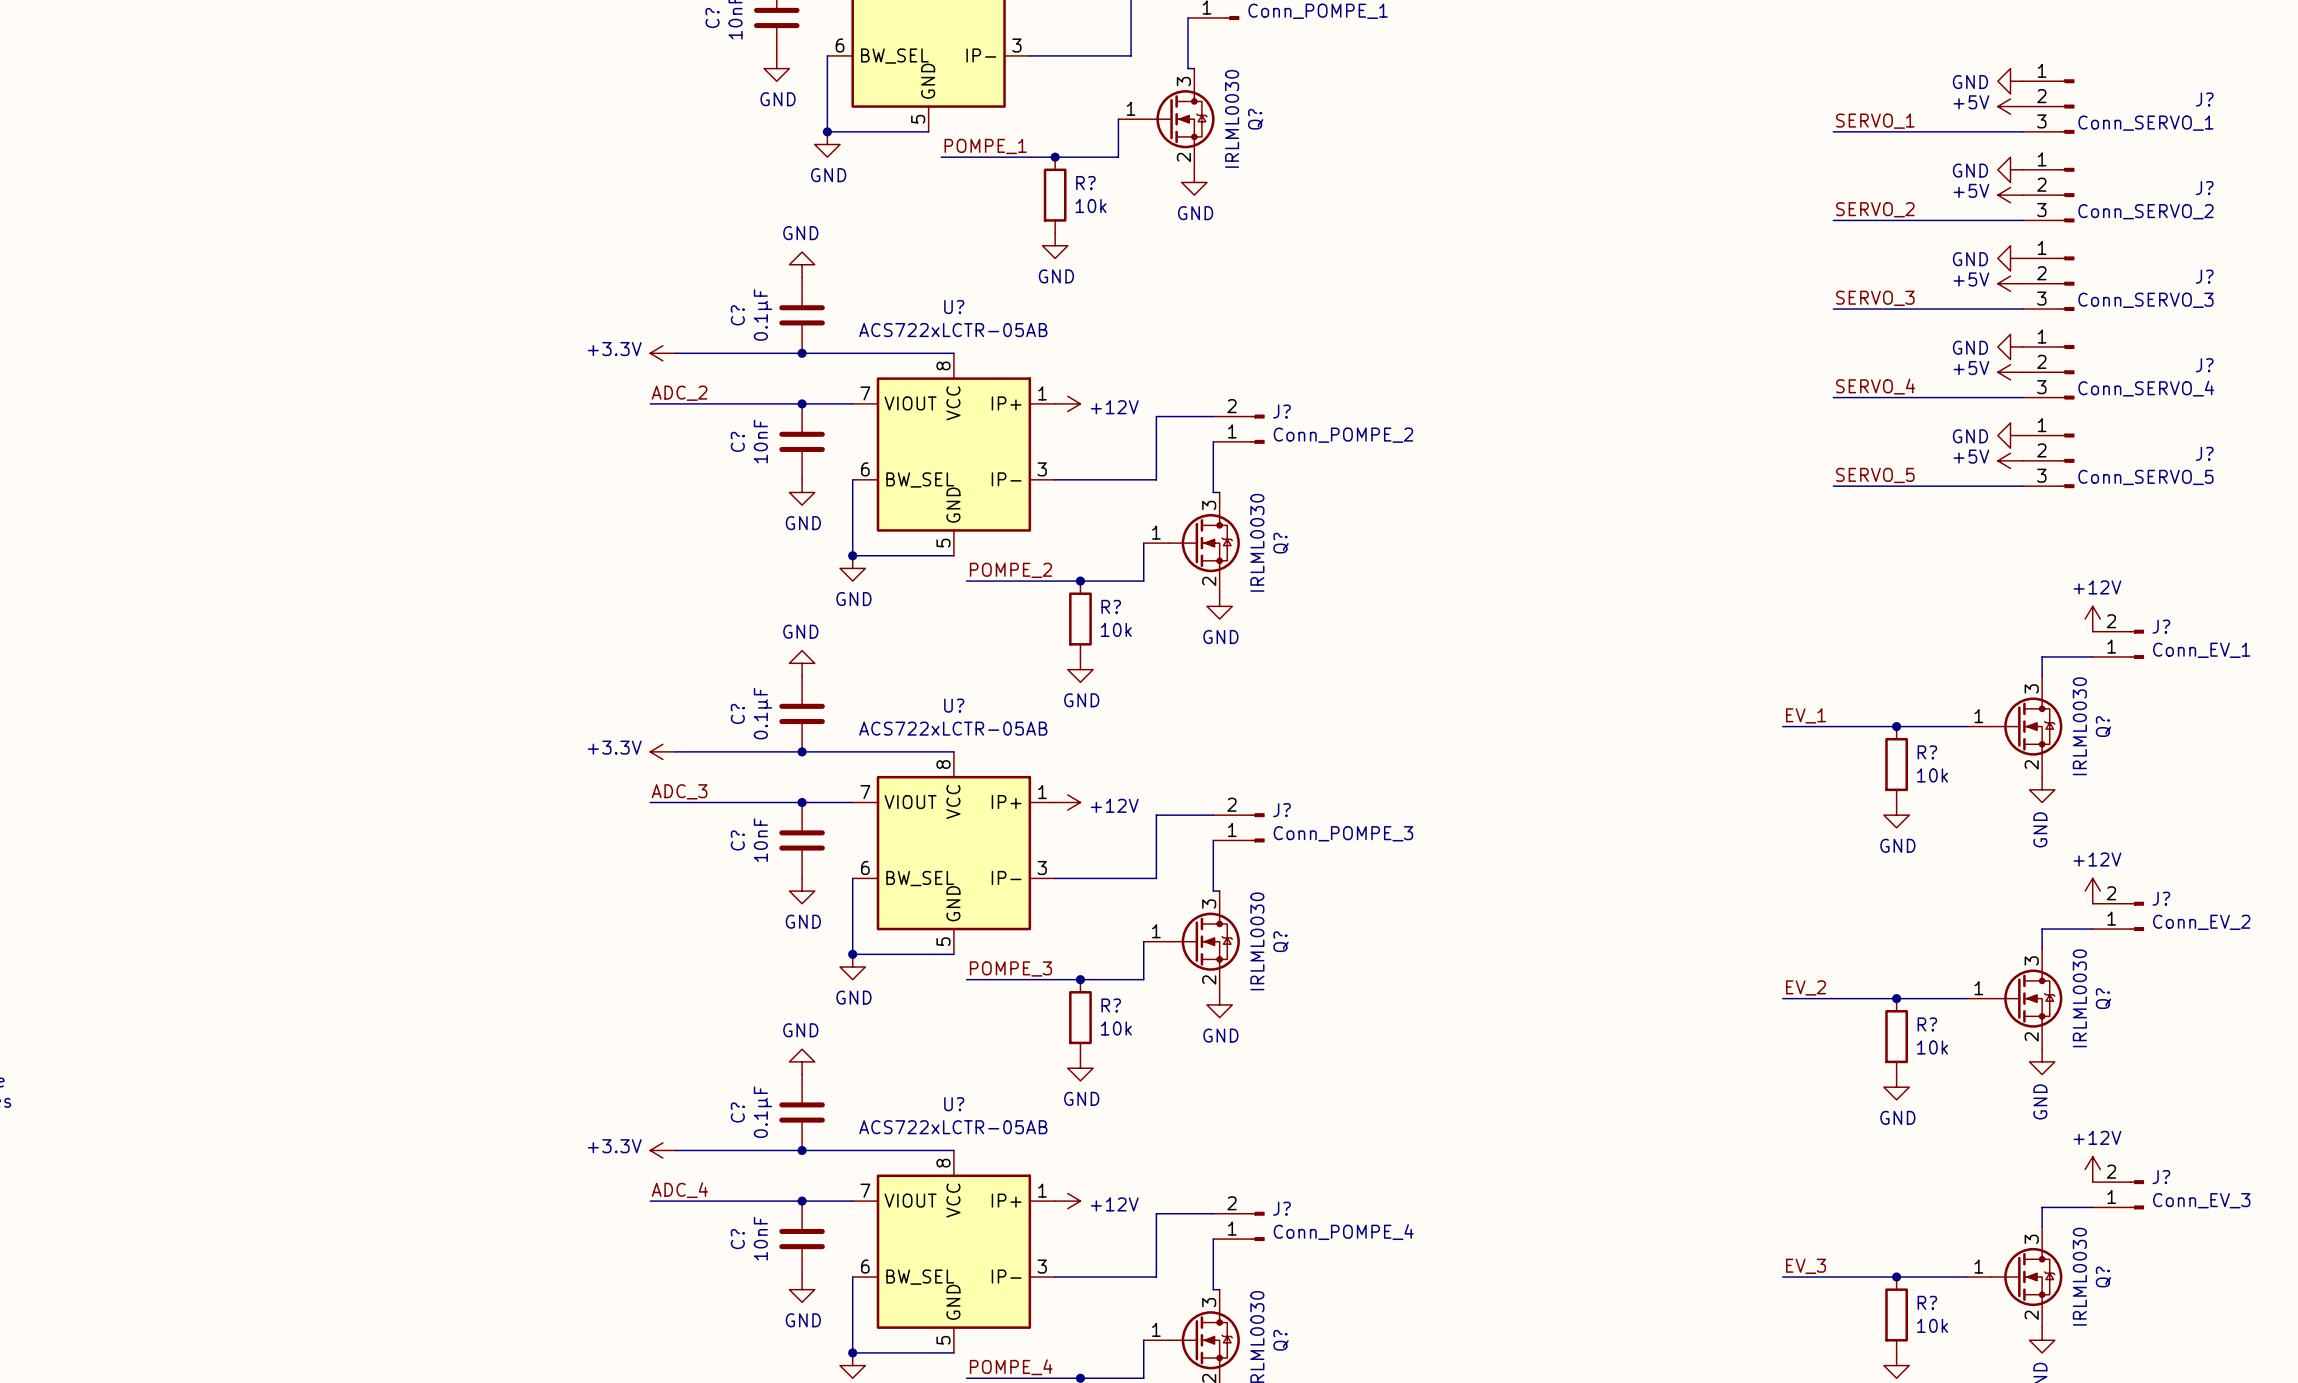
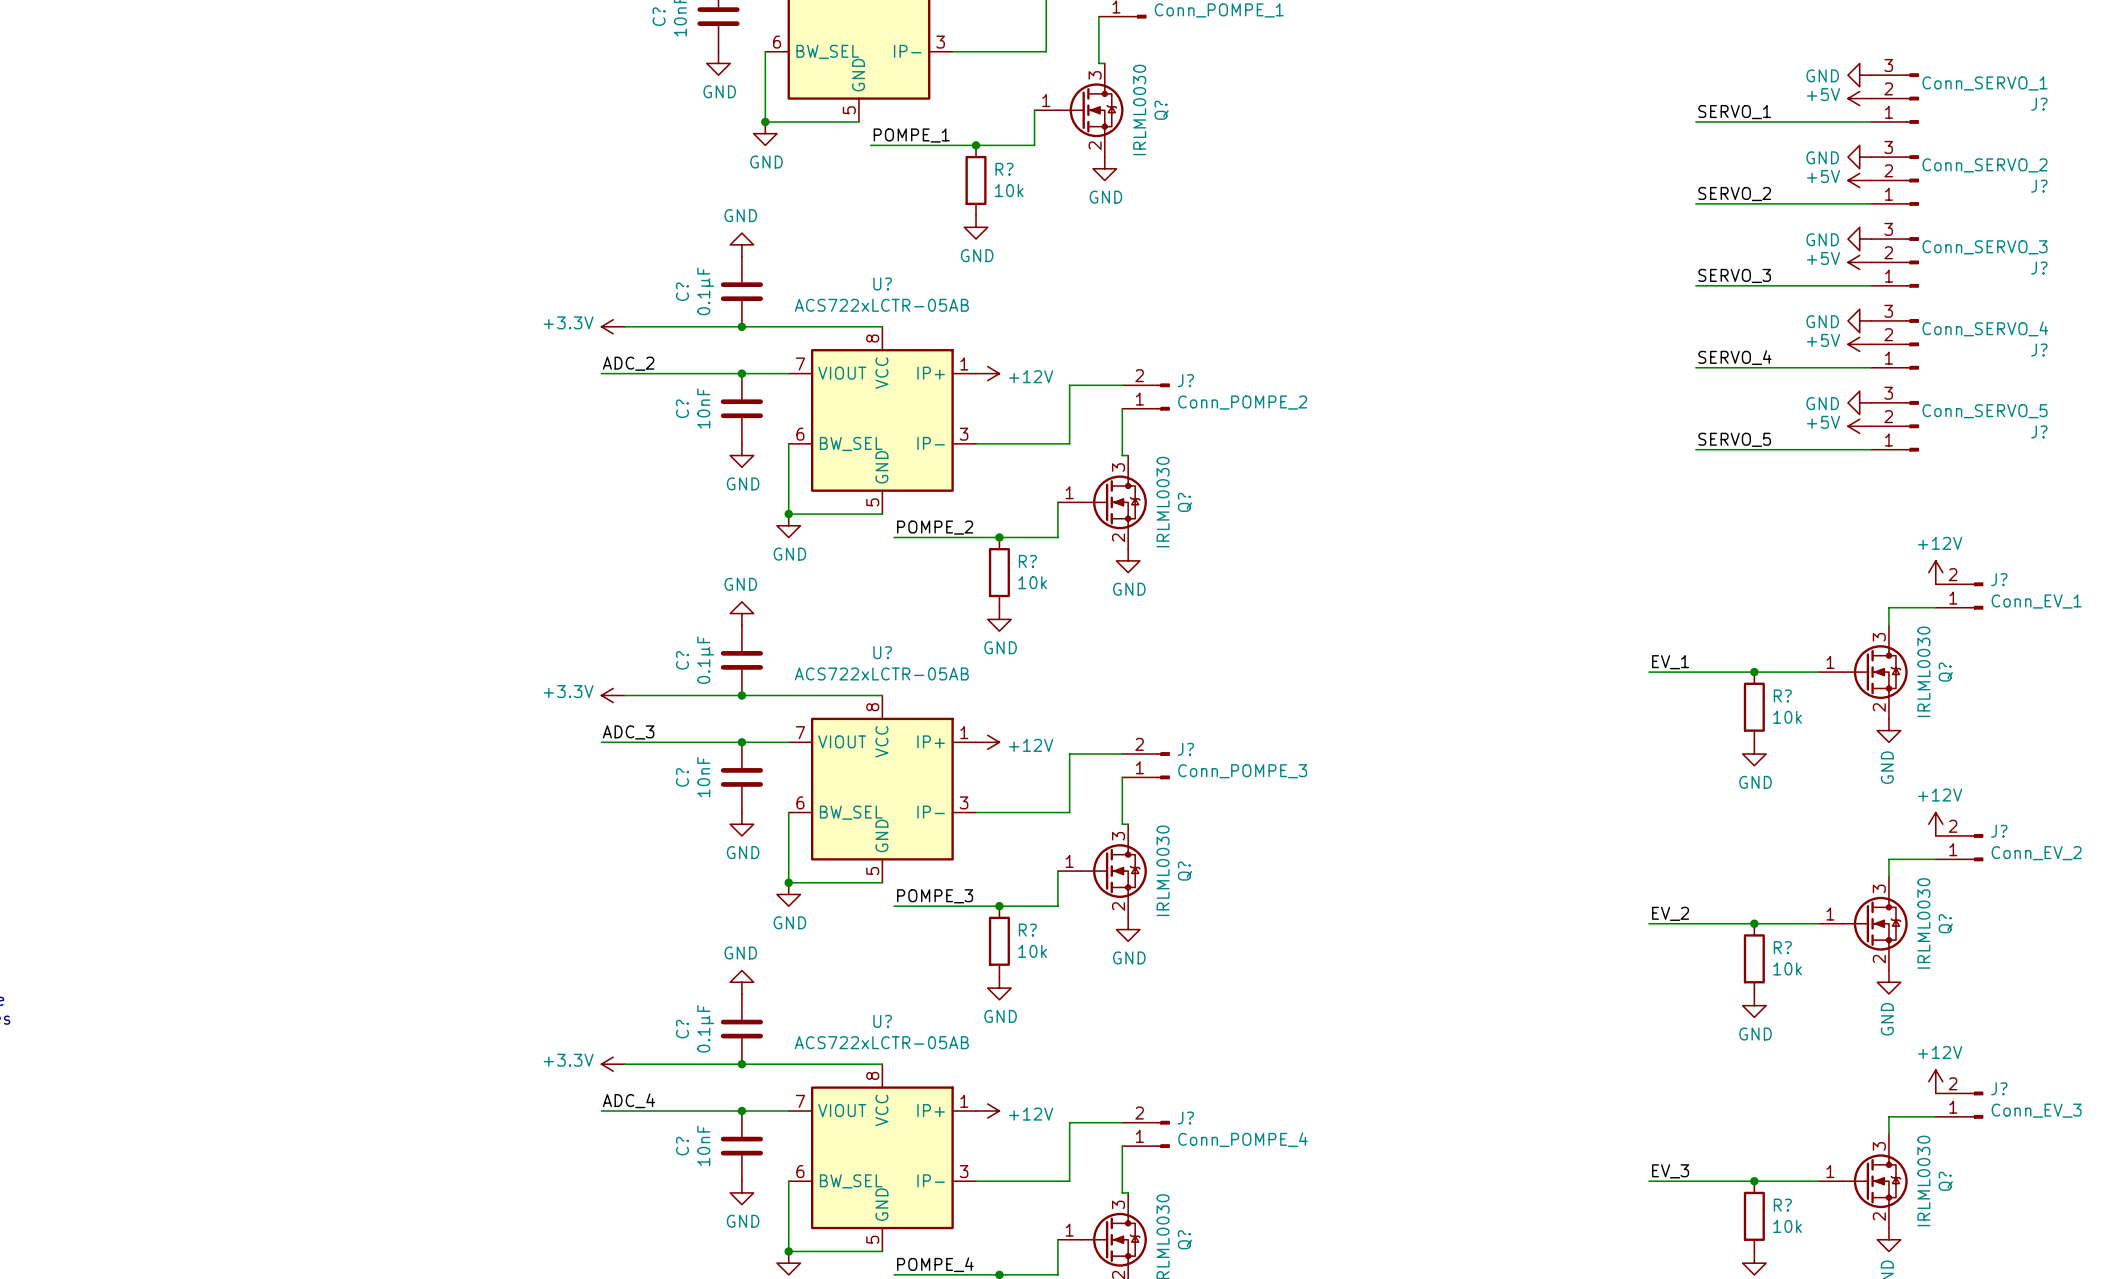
J? flip: as is (2067, 106) -> up-down (1912, 98)
J? flip: as is (2067, 195) -> up-down (1912, 180)
J? flip: as is (2067, 283) -> up-down (1912, 262)
J? flip: as is (2067, 372) -> up-down (1912, 344)
J? flip: as is (2067, 460) -> up-down (1912, 426)

